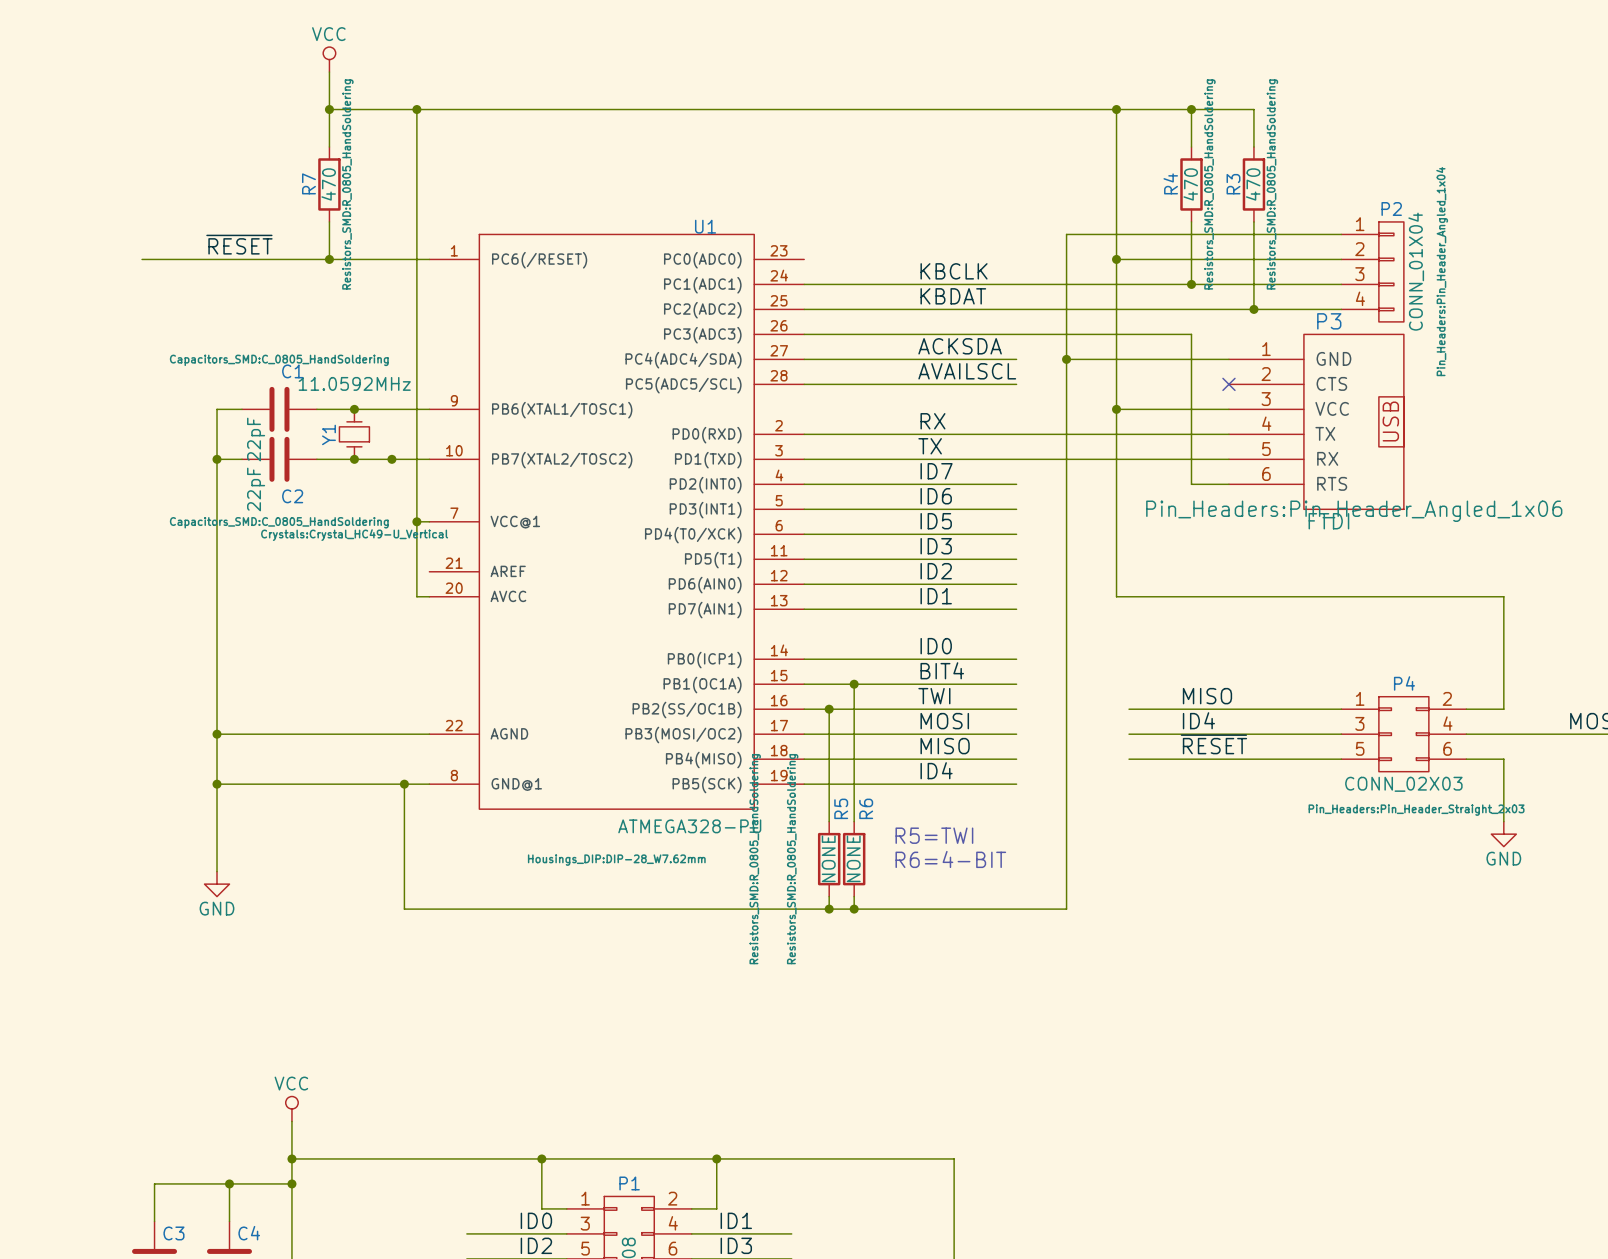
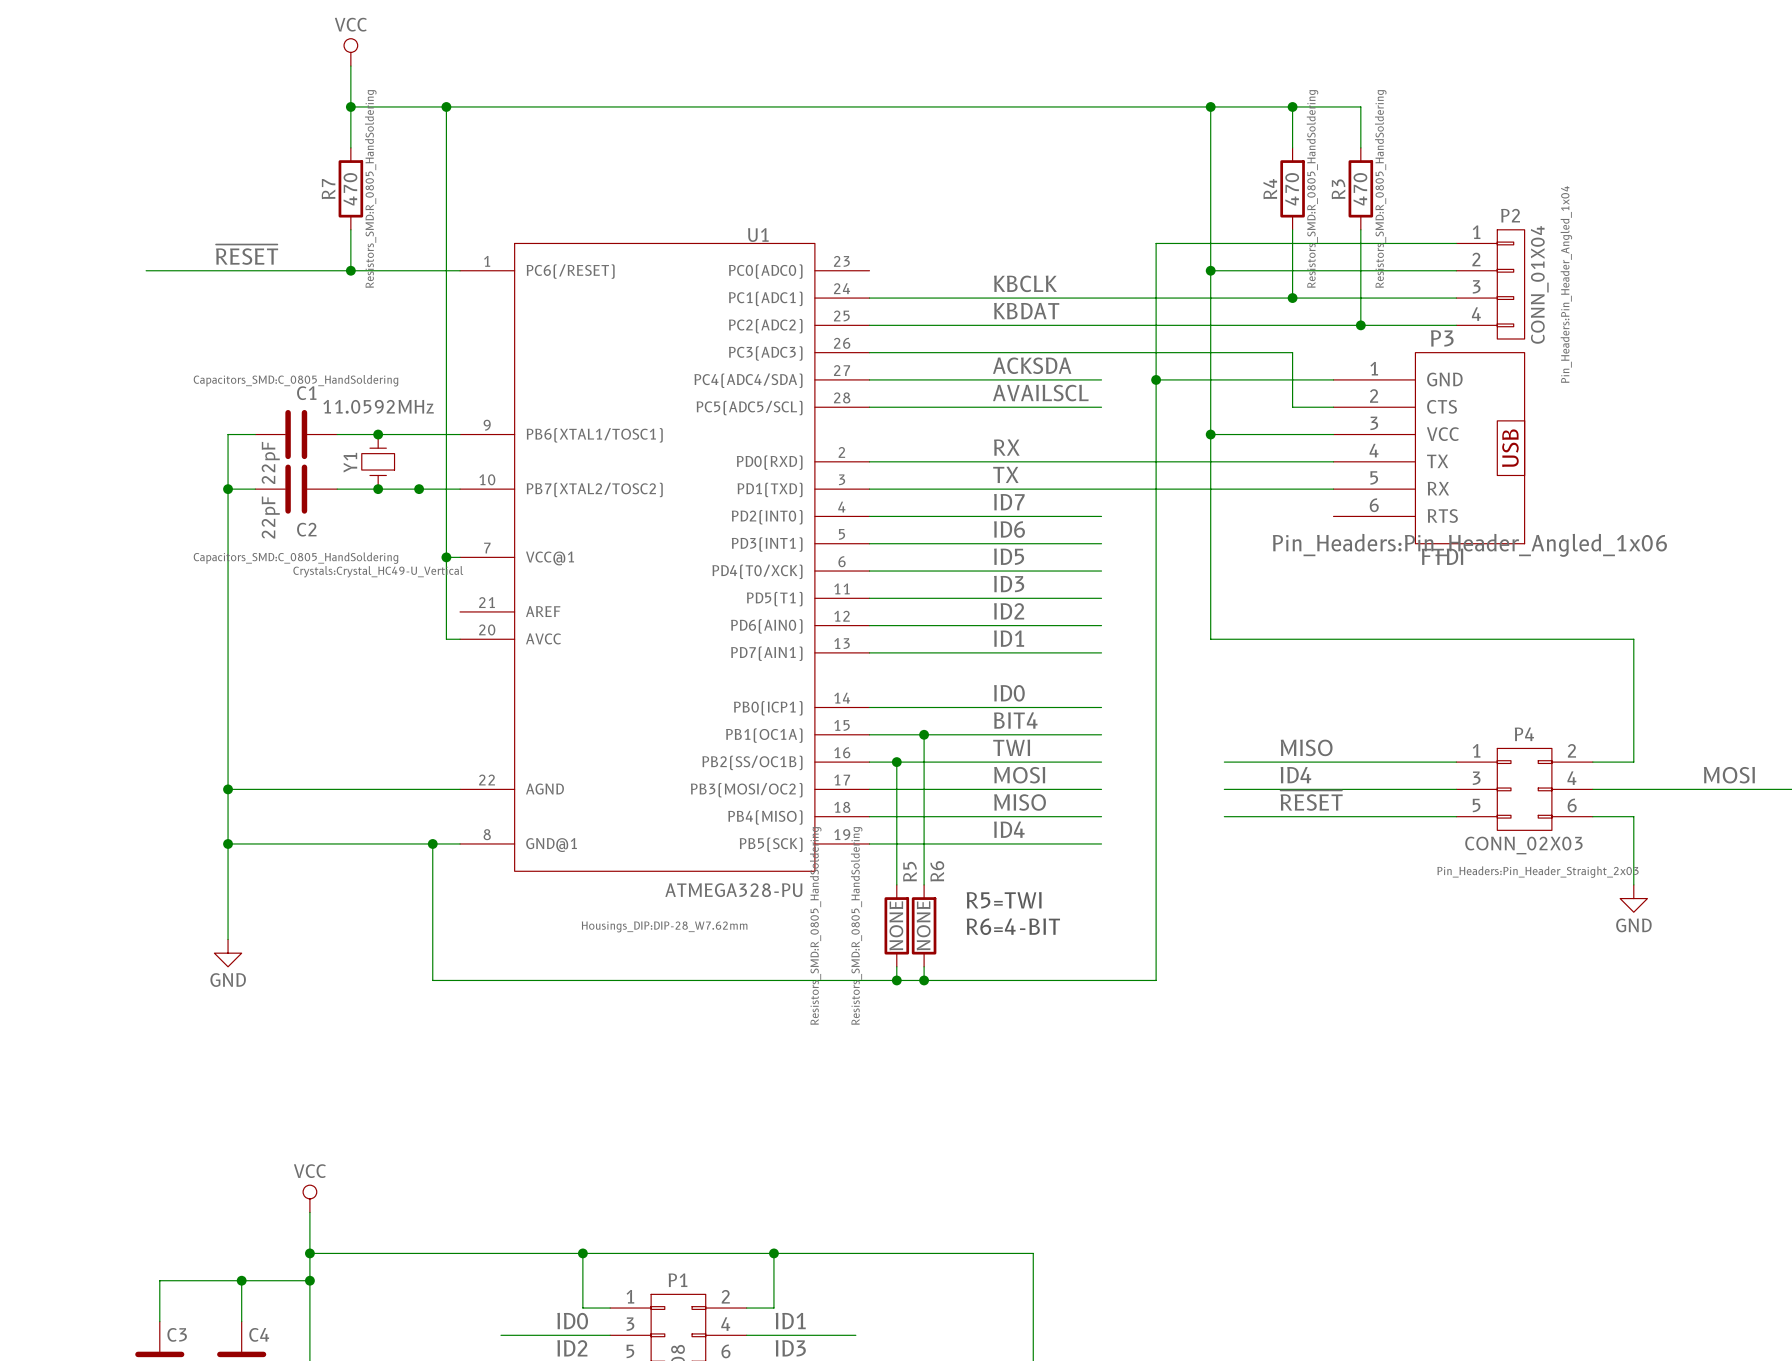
wire: (1191, 384) (1191, 484) (1228, 484) -> (1292, 407) (1333, 407)
no-connect mark: (1228, 384) -> none

